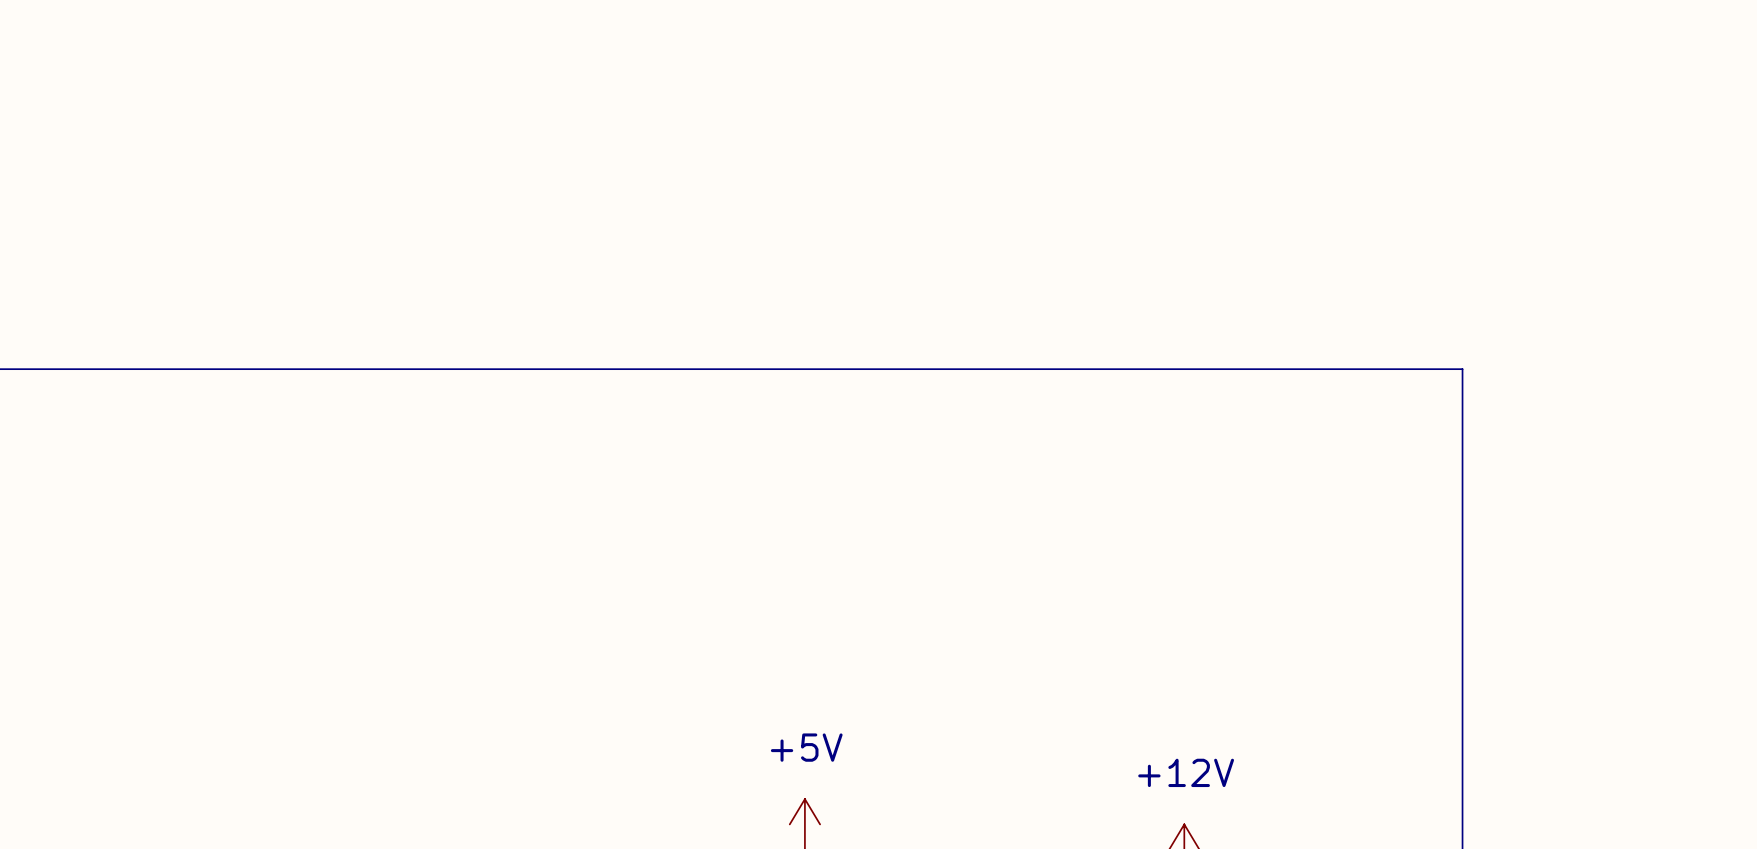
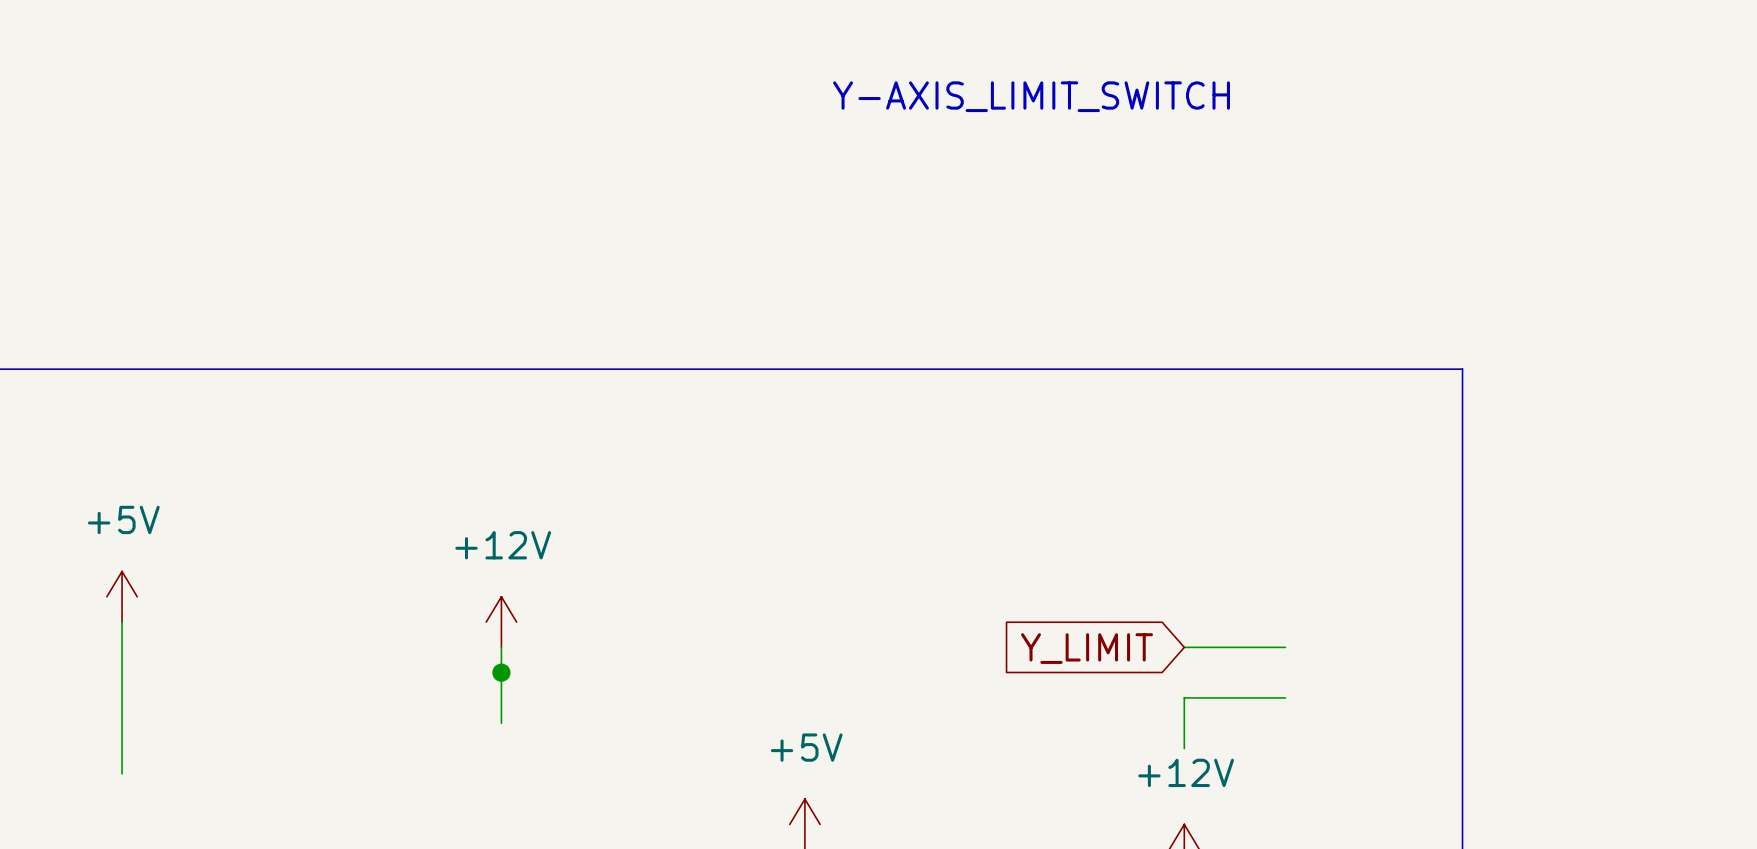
text: none -> Y-AXIS_LIMIT_SWITCH (1031, 96)
power symbol: none -> +5V (122, 596)
wire: none -> (122, 622) (122, 773)
power symbol: none -> +12V (501, 622)
wire: none -> (501, 647) (501, 723)
wire: none -> (1184, 647) (1285, 647)
global label: none -> Y_LIMIT (1087, 648)
junction: none -> (501, 672)
wire: none -> (1285, 697) (1184, 697) (1184, 748)

